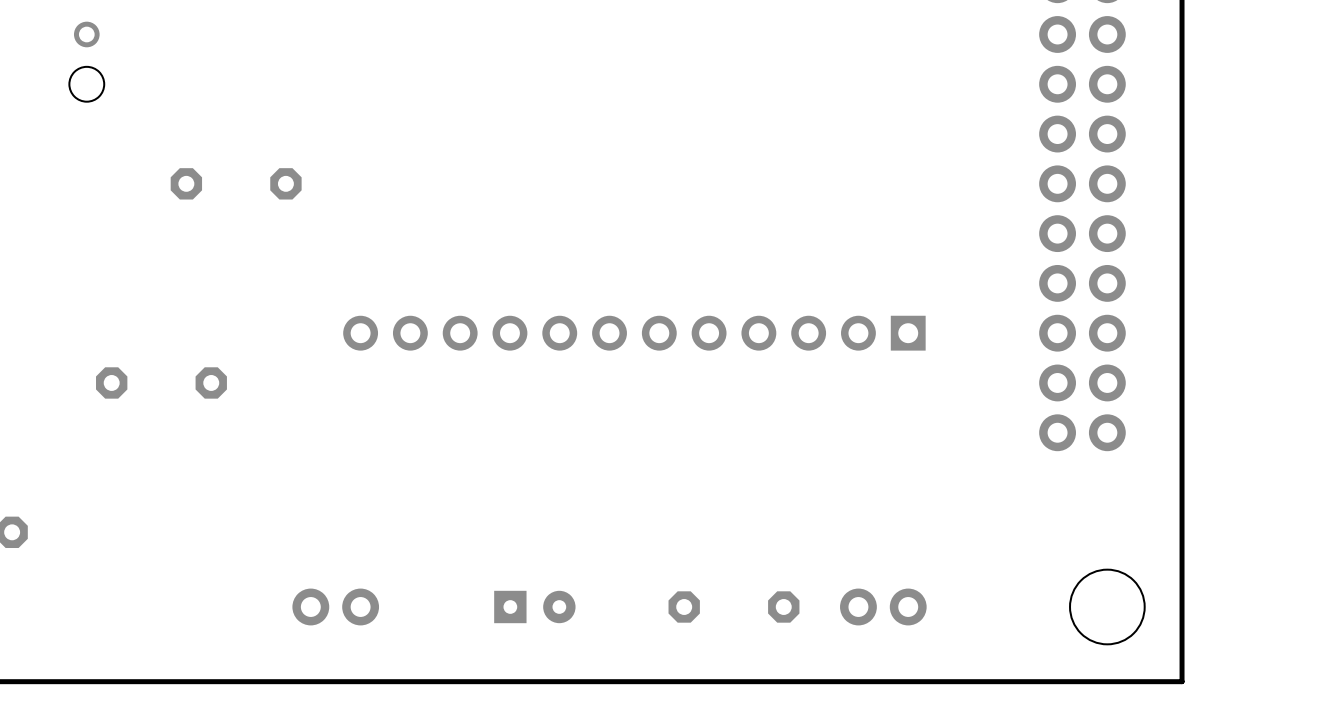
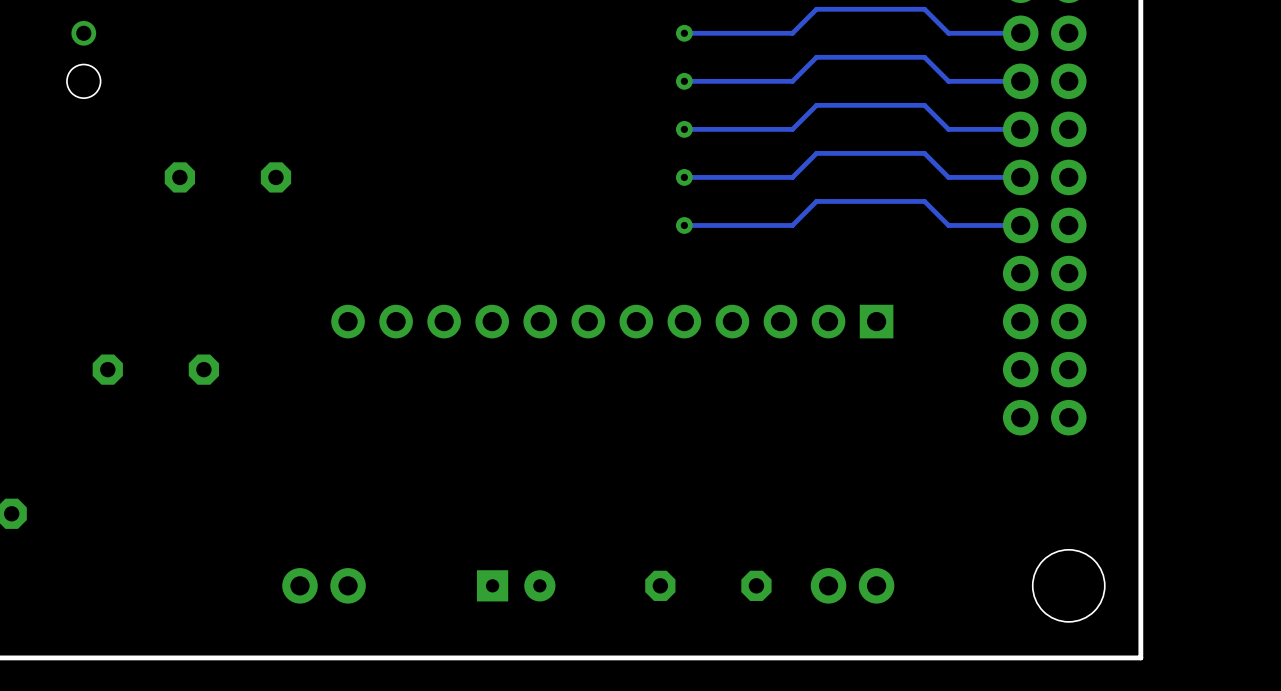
via: none -> (684, 33)
track: none -> (1020, 33) (948, 33) (924, 9) (816, 9) (792, 33) (684, 33)
via: none -> (684, 81)
track: none -> (1020, 81) (948, 81) (924, 57) (816, 57) (792, 81) (684, 81)
via: none -> (684, 129)
track: none -> (1020, 129) (948, 129) (924, 105) (816, 105) (792, 129) (684, 129)
via: none -> (684, 177)
track: none -> (1020, 177) (948, 177) (924, 153) (816, 153) (792, 177) (684, 177)
via: none -> (684, 225)
track: none -> (1020, 225) (948, 225) (924, 201) (816, 201) (792, 225) (684, 225)

